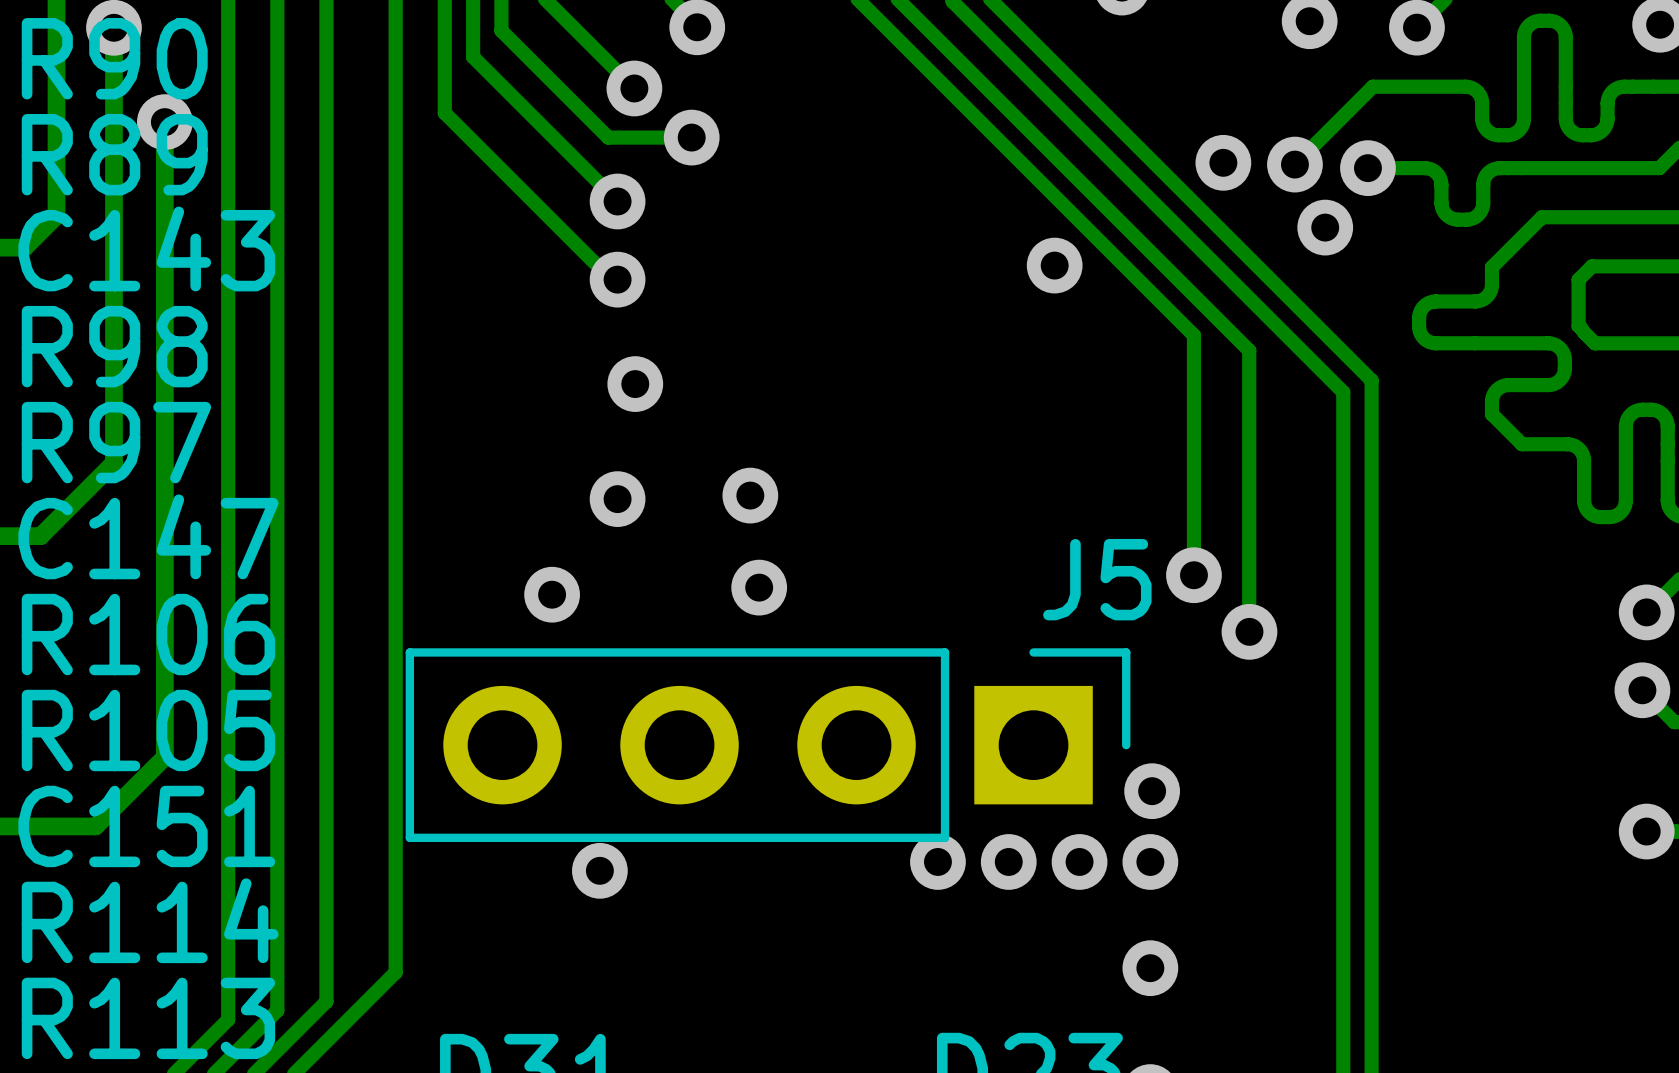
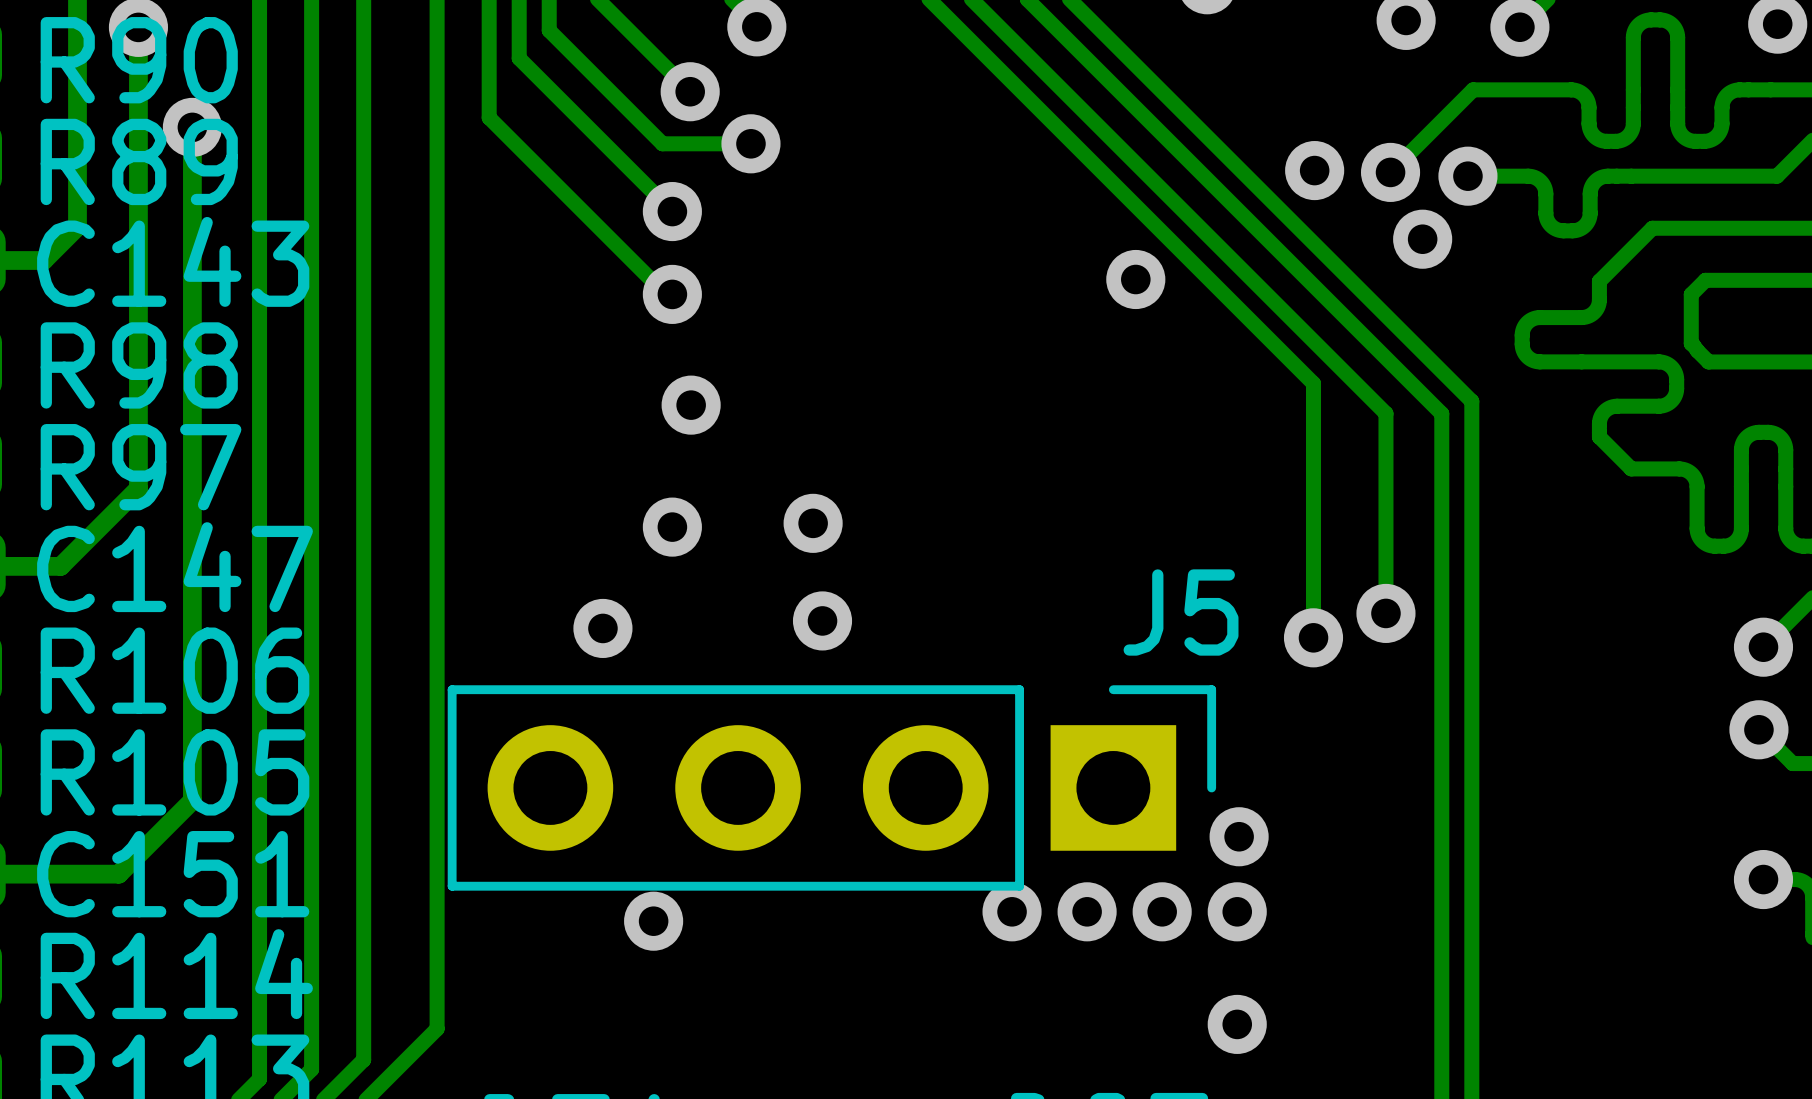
track: (1193, 335) (1193, 575) -> (1283, 353) (1313, 383) (1313, 637)
track: (1249, 350) (1249, 631) -> (1342, 369) (1385, 413) (1385, 613)
via: (1193, 575) -> none
via: none -> (1385, 613)
via: none -> (1313, 637)
via: (1249, 631) -> none

